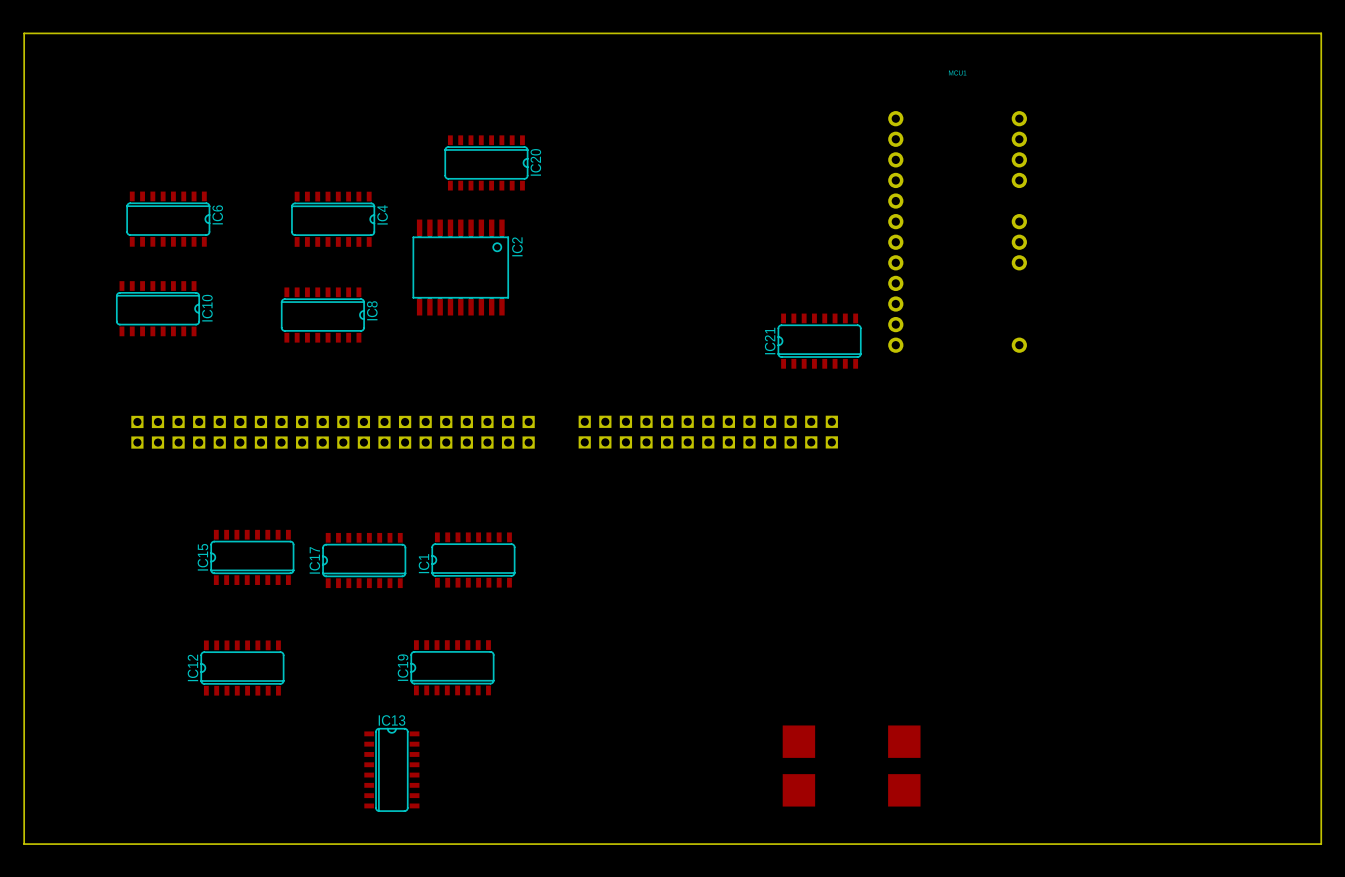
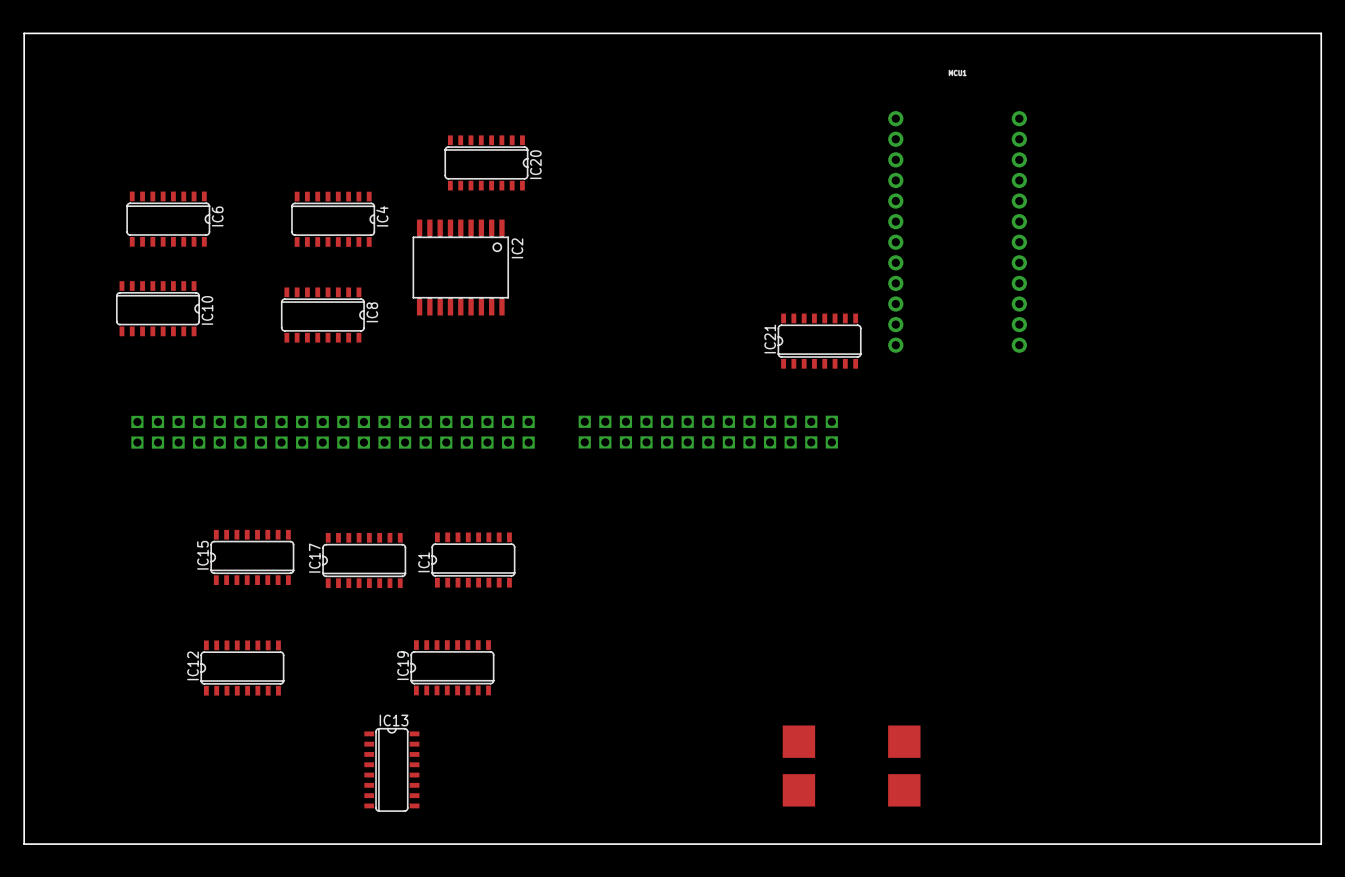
part footprint: [888, 111, 1027, 353] -> [888, 111, 1027, 353]

